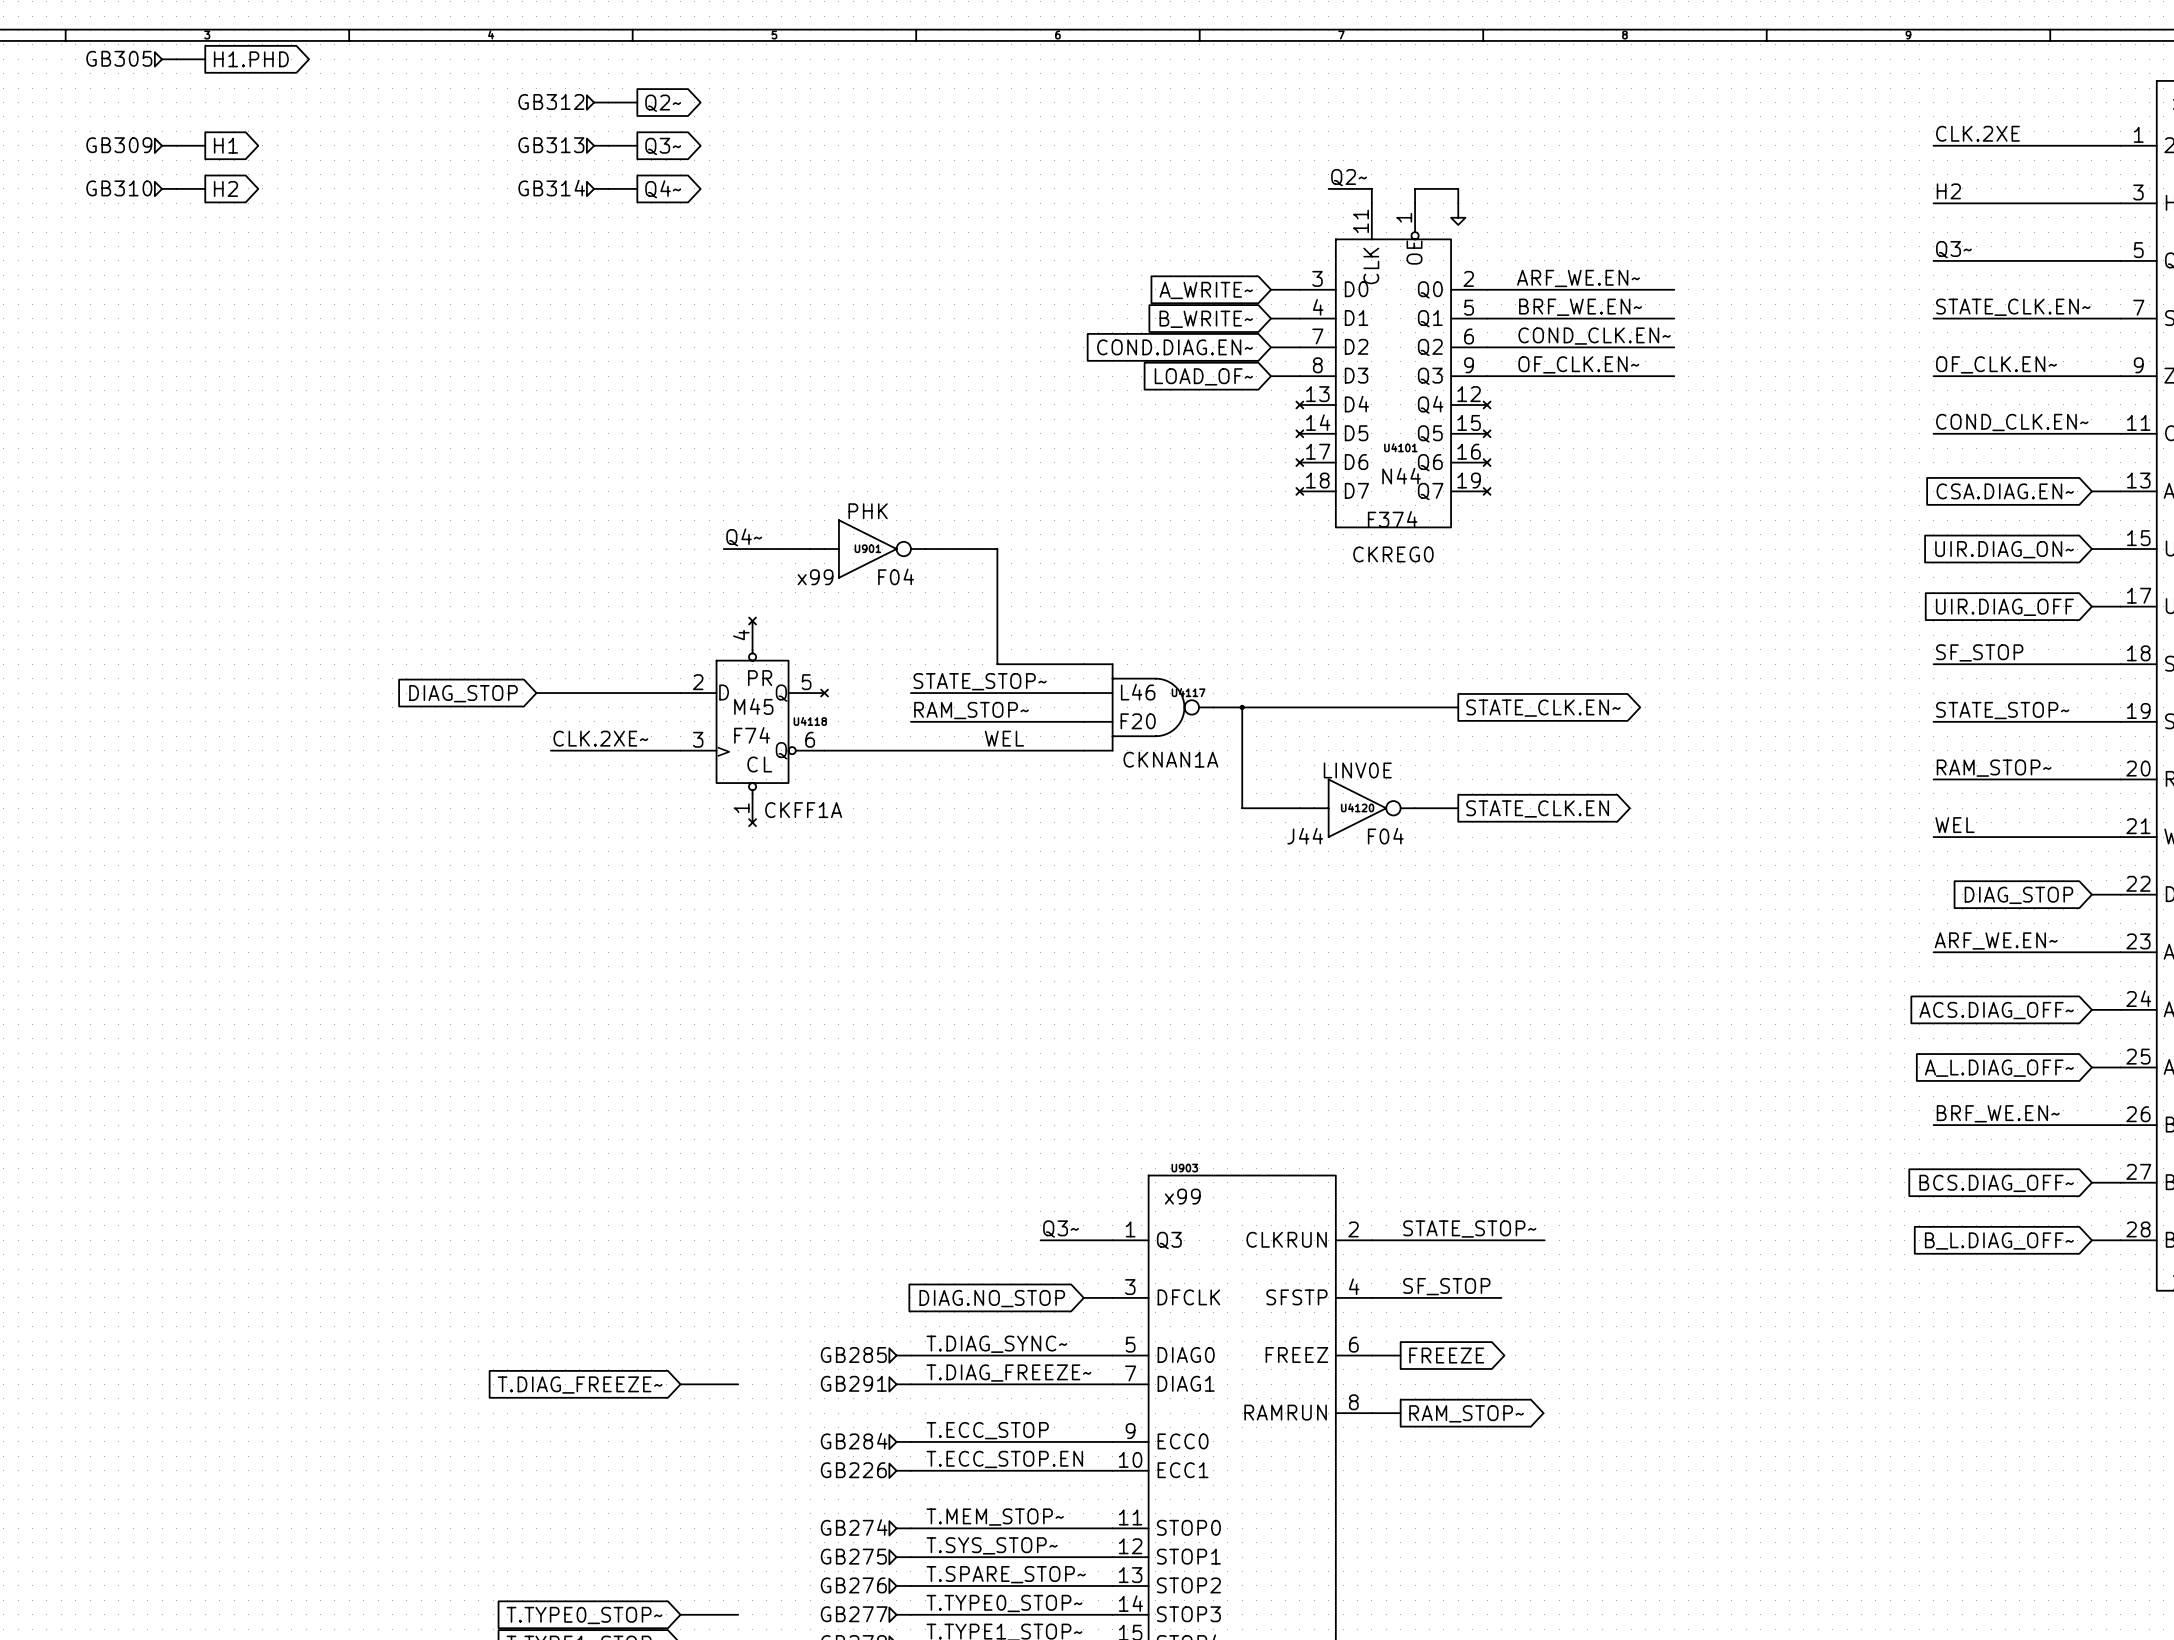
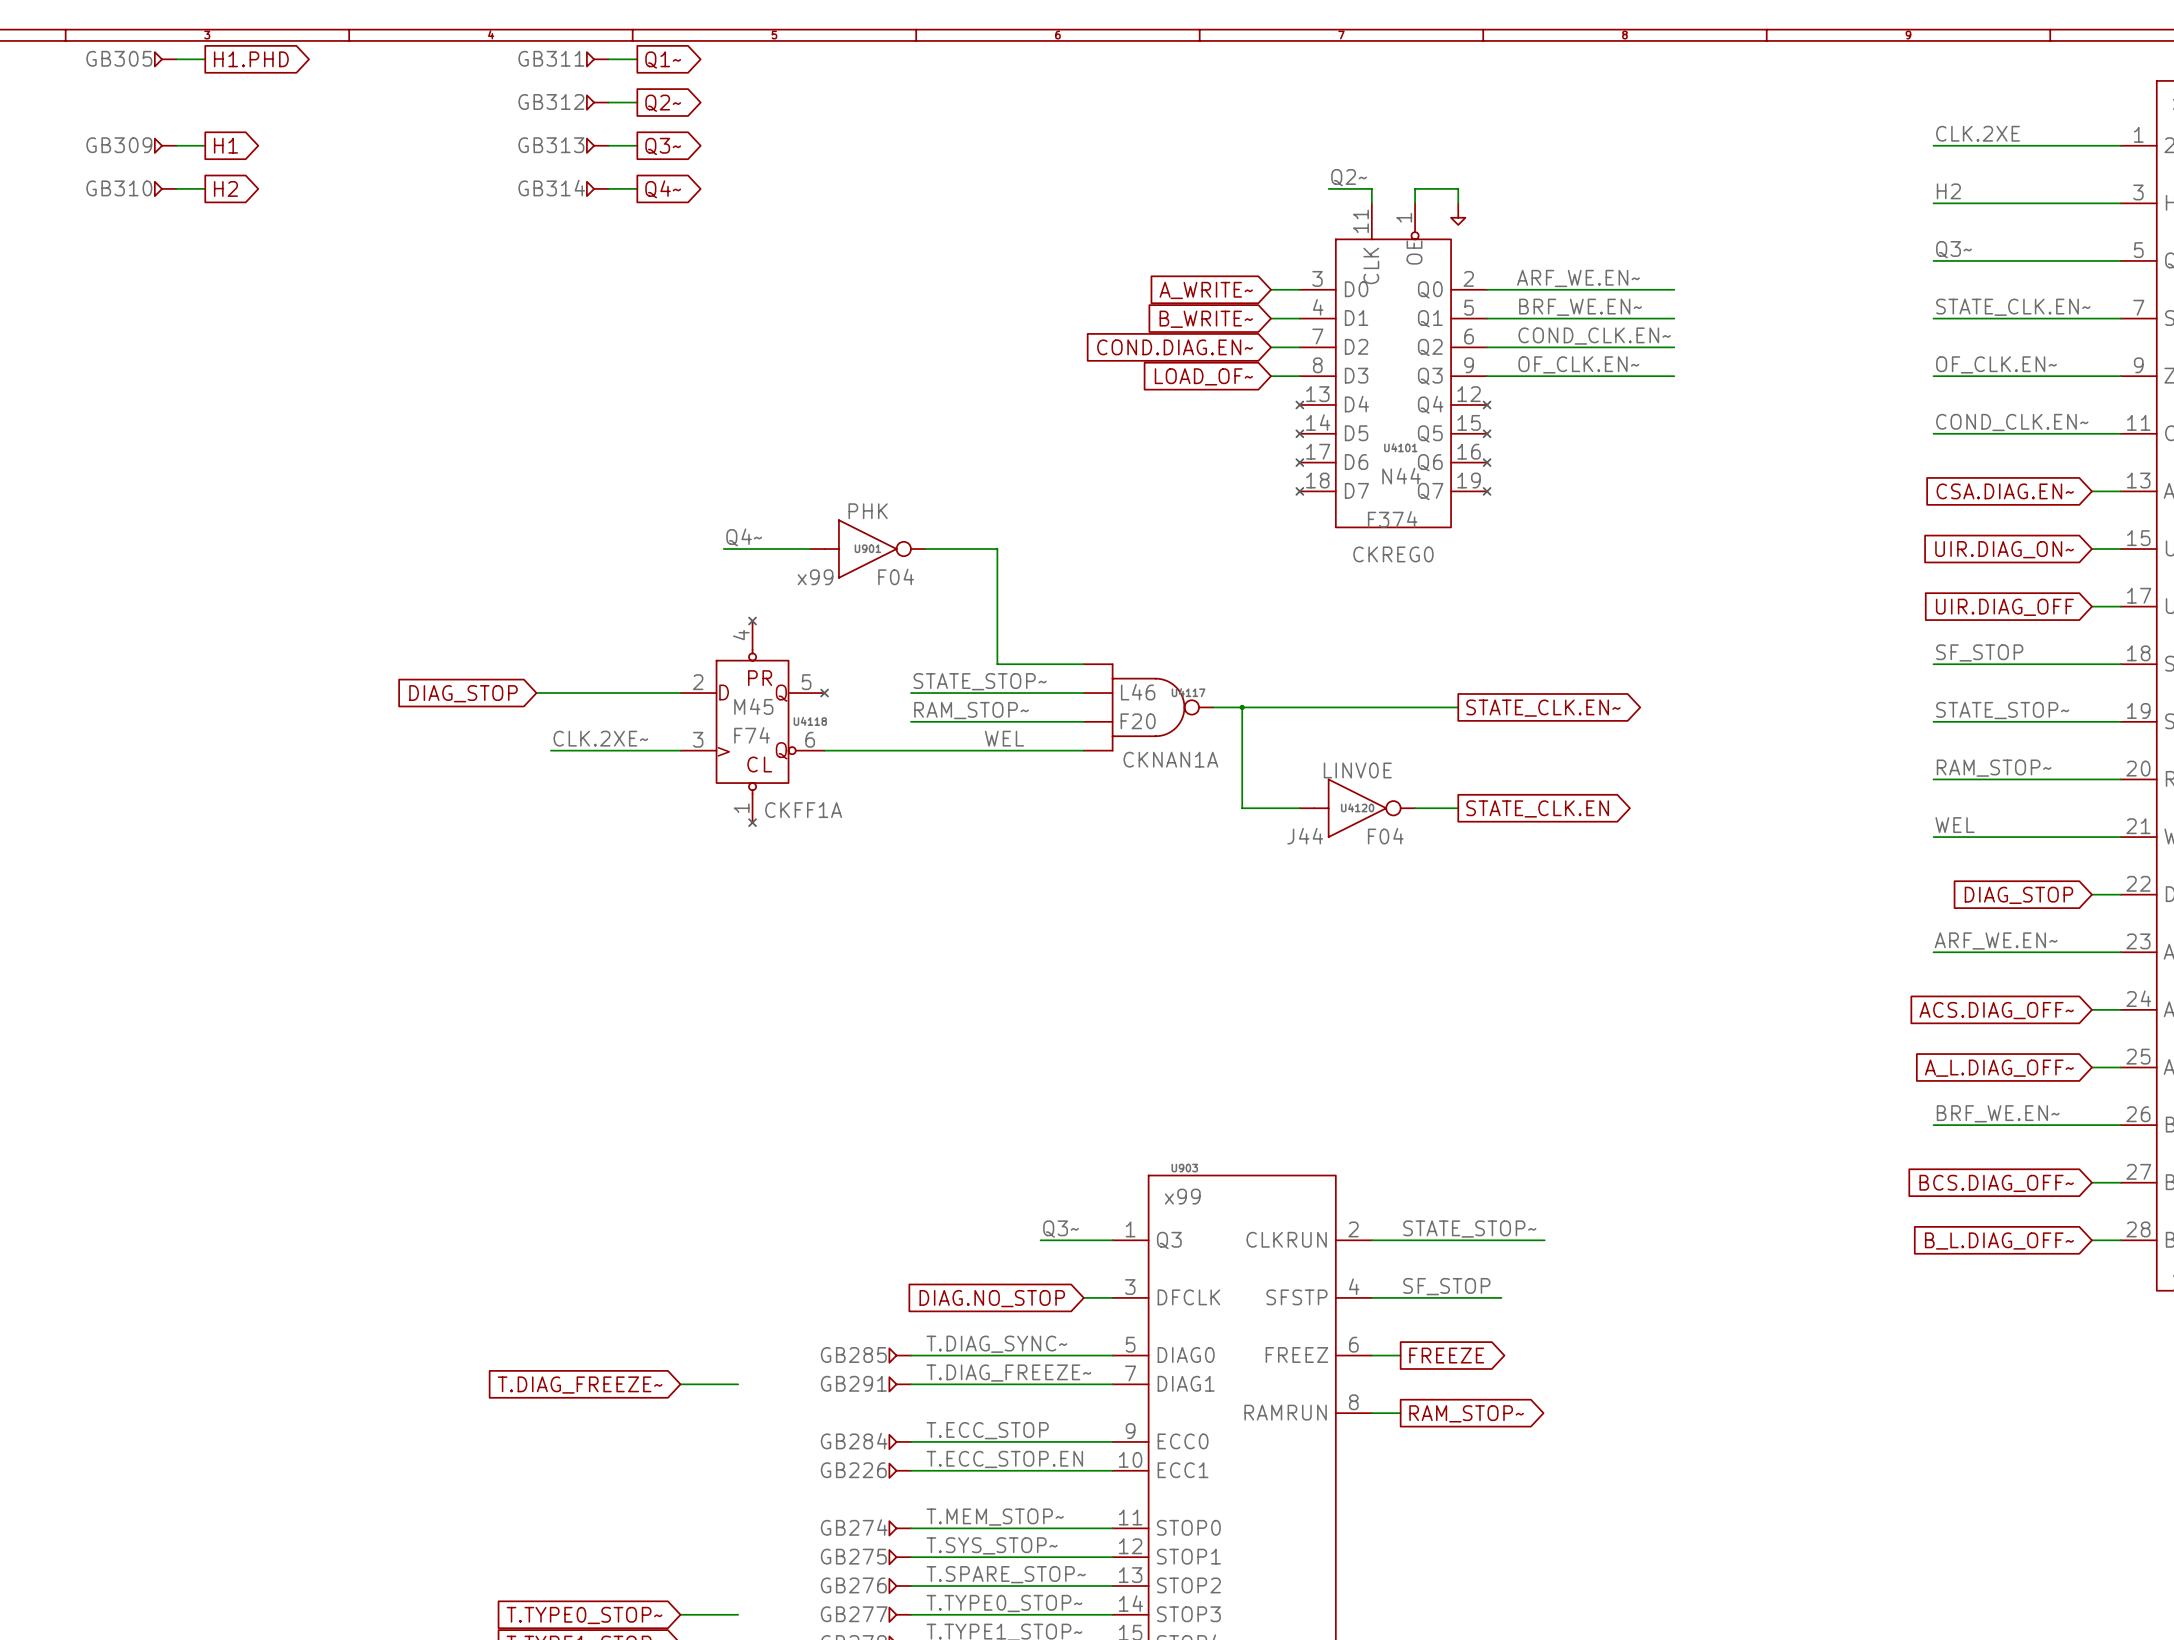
GB311: none -> (597, 59)
wire: none -> (608, 59) (637, 59)
global label: none -> Q1~ (663, 60)

